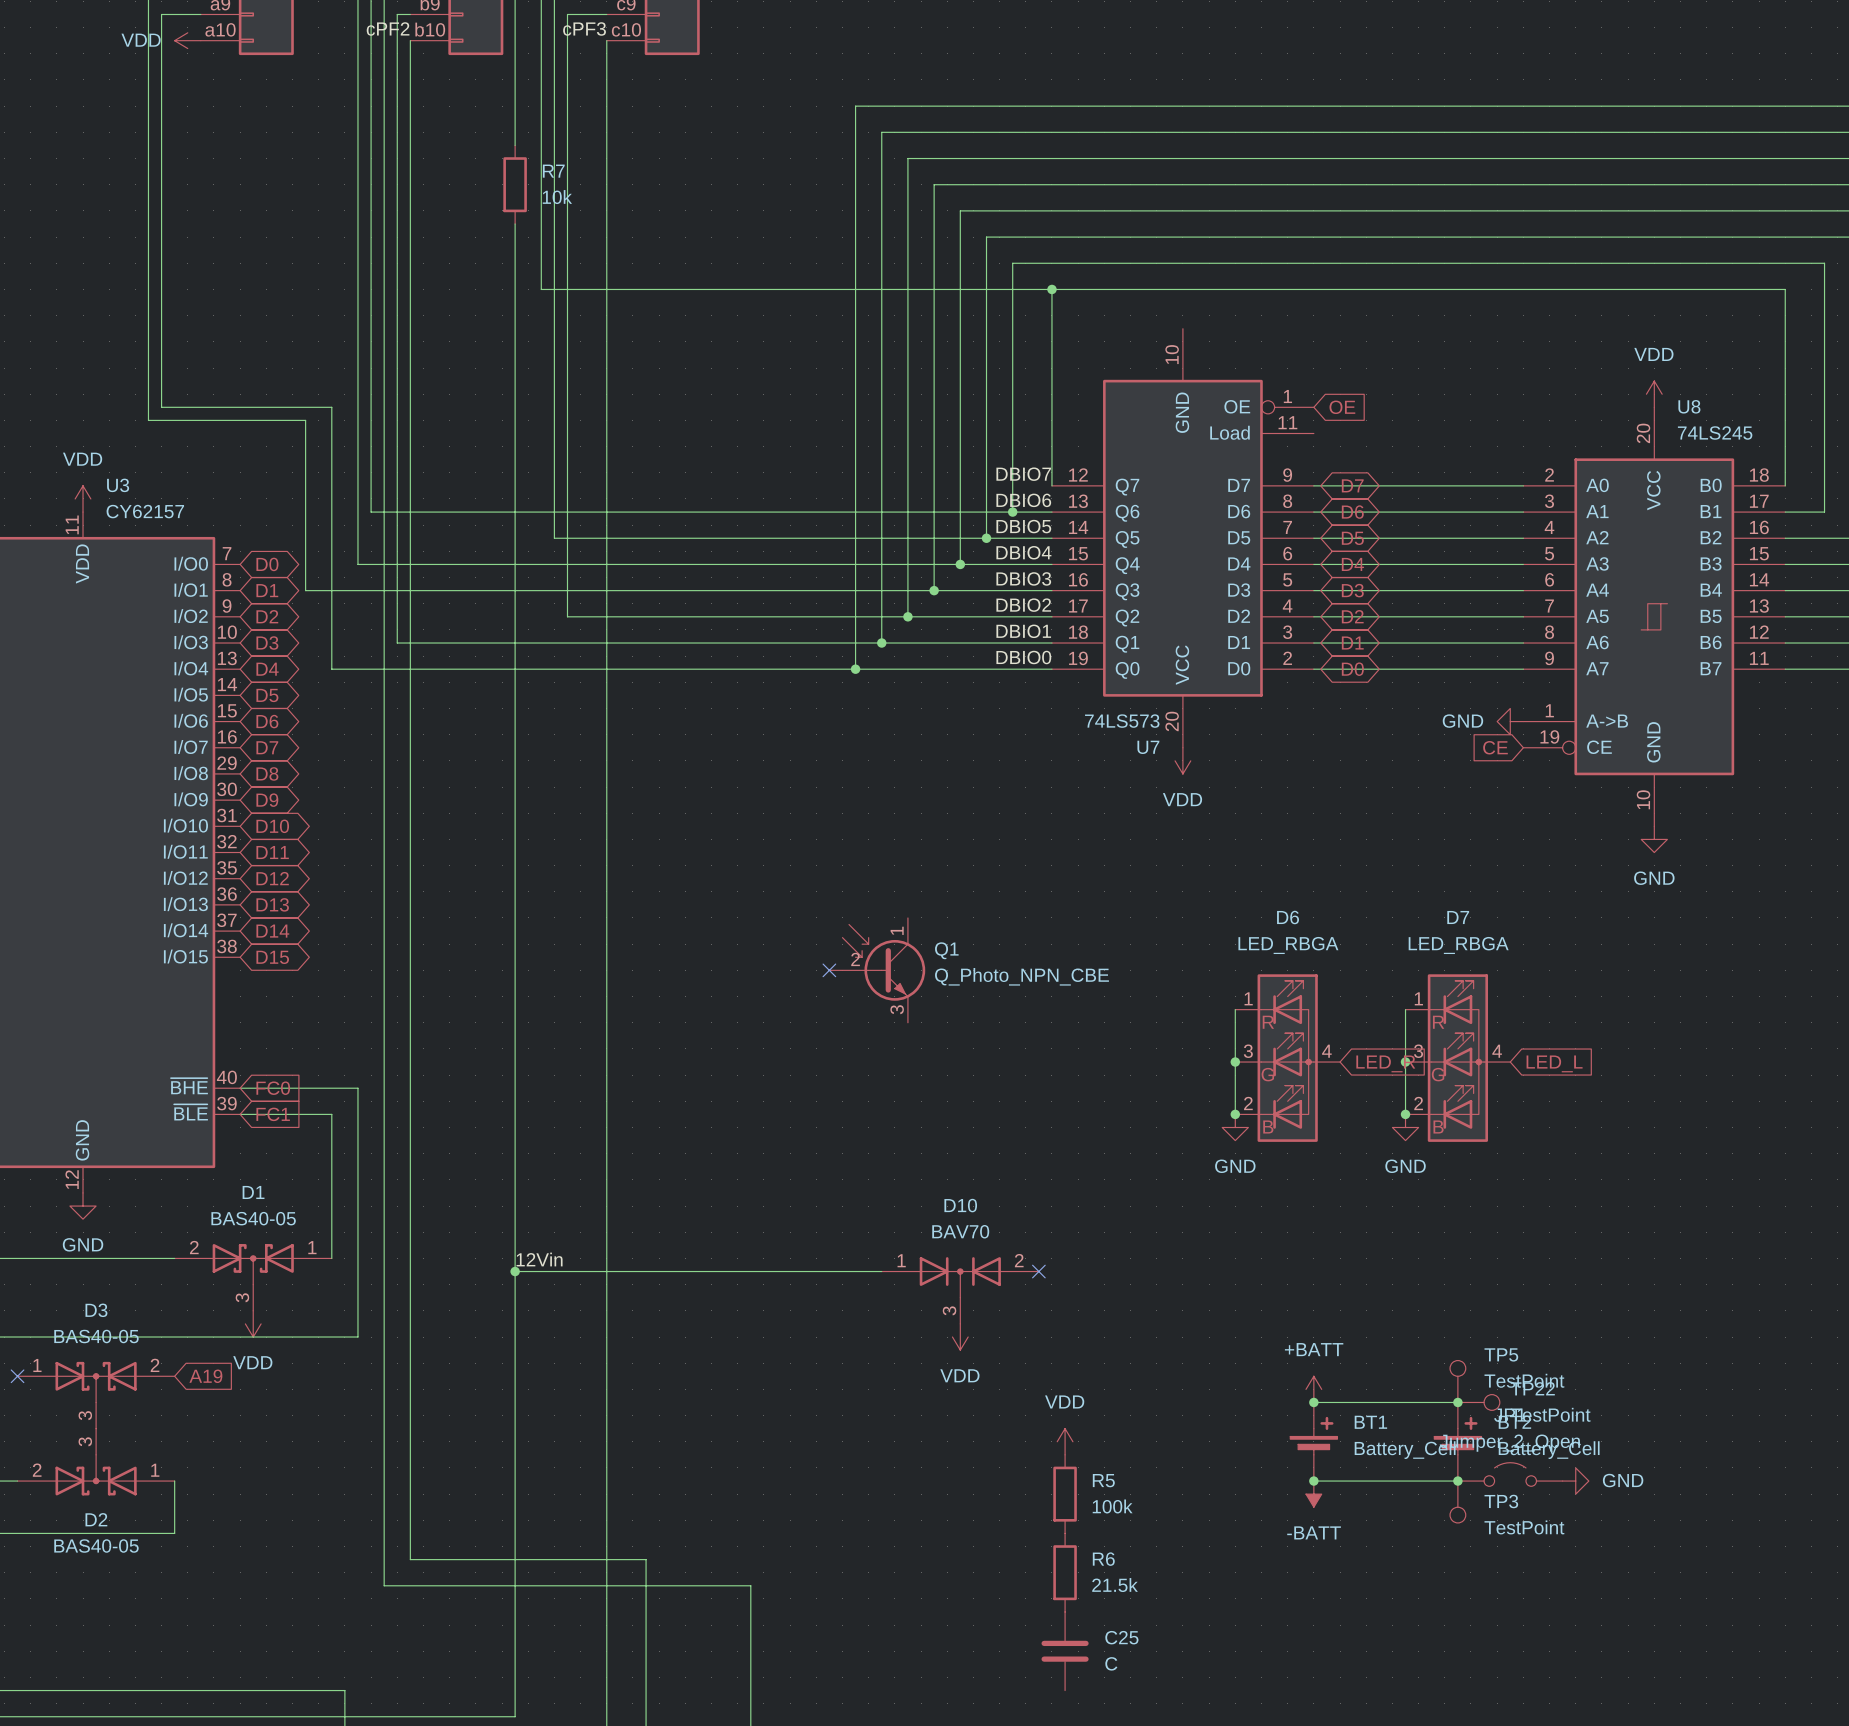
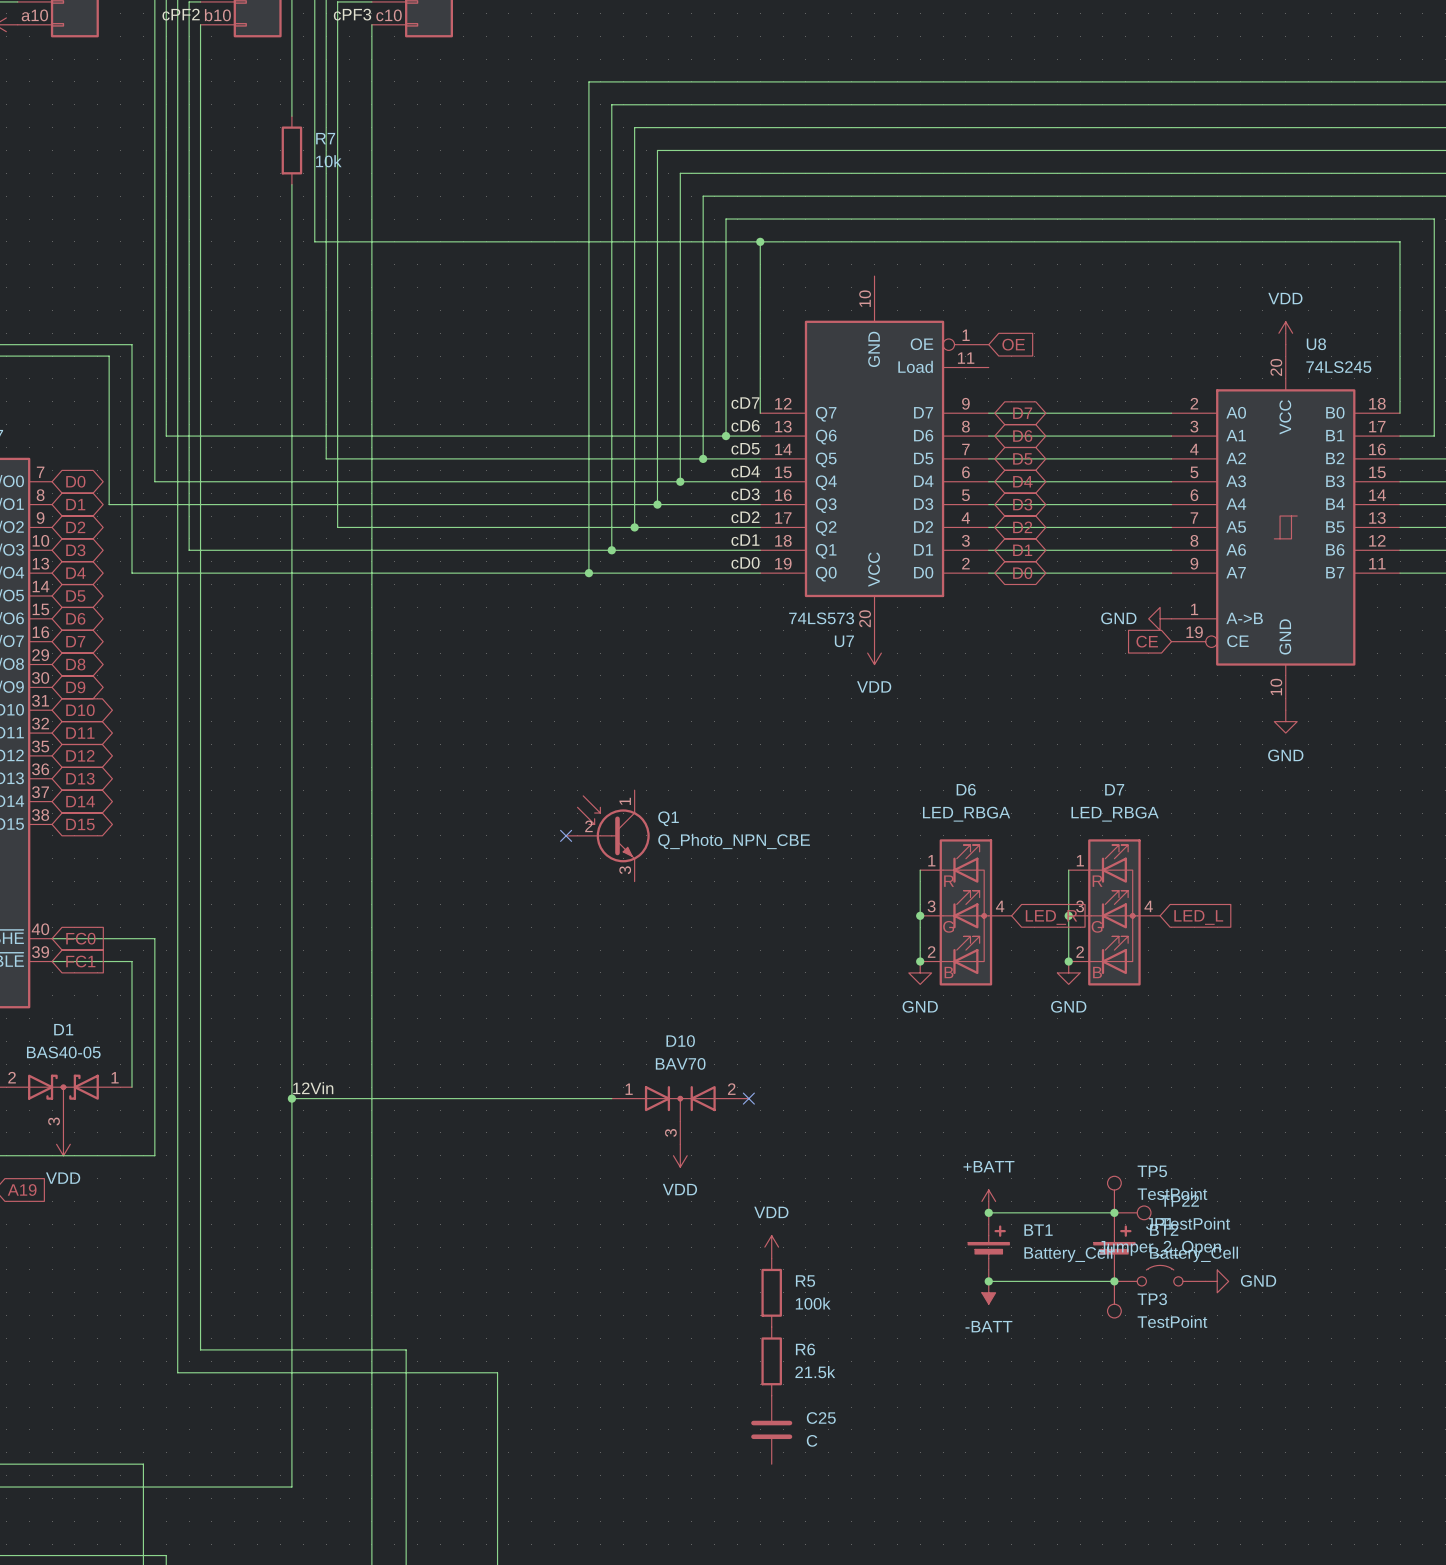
label: DBIO7 (1023, 474) -> cD7 (745, 403)
label: DBIO6 (1023, 500) -> cD6 (745, 425)
label: DBIO5 (1023, 526) -> cD5 (745, 448)
label: DBIO4 (1023, 552) -> cD4 (745, 471)
label: DBIO3 (1023, 578) -> cD3 (745, 494)
label: DBIO2 (1023, 605) -> cD2 (745, 517)
label: DBIO1 (1023, 631) -> cD1 (745, 540)
label: DBIO0 (1023, 657) -> cD0 (745, 562)

